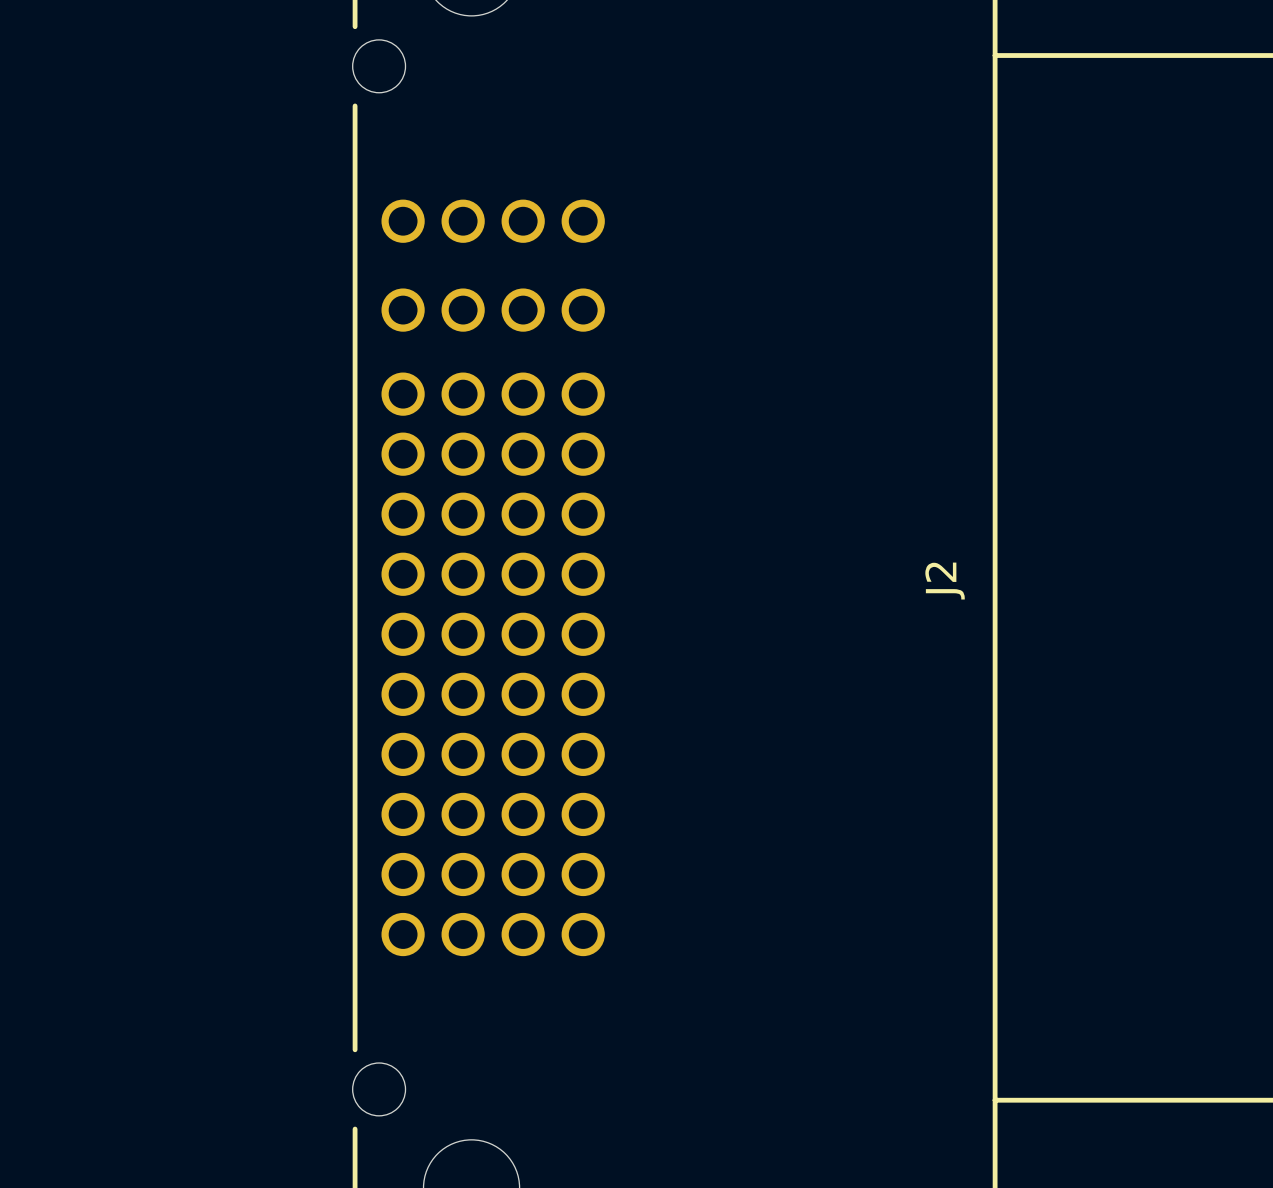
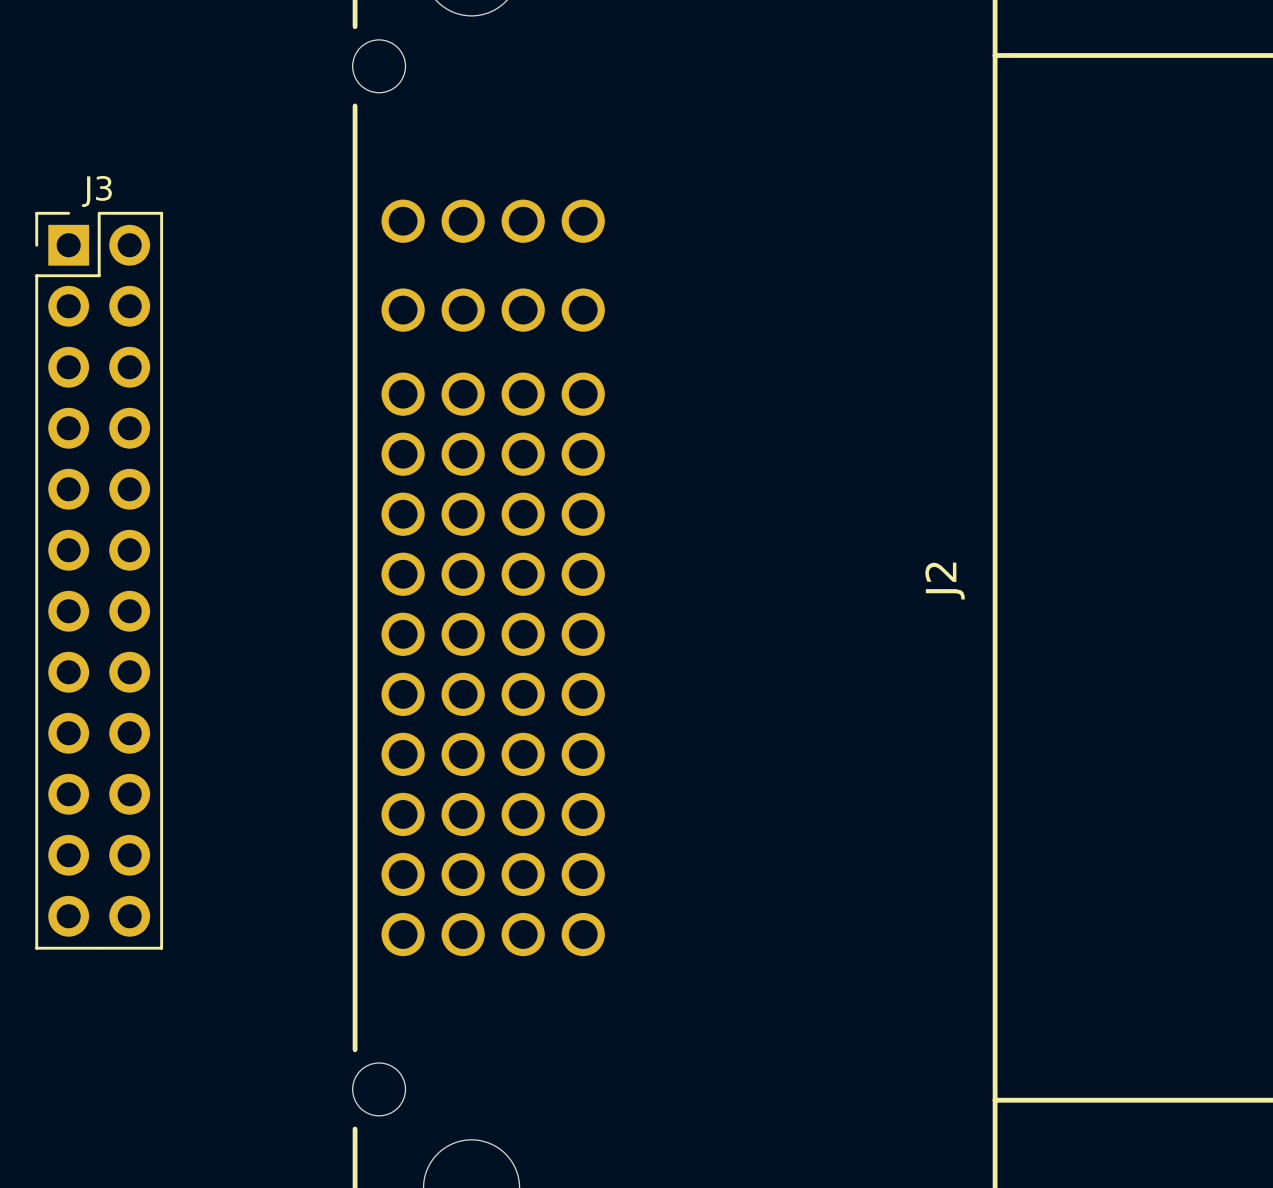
J3: none -> (99, 580)

